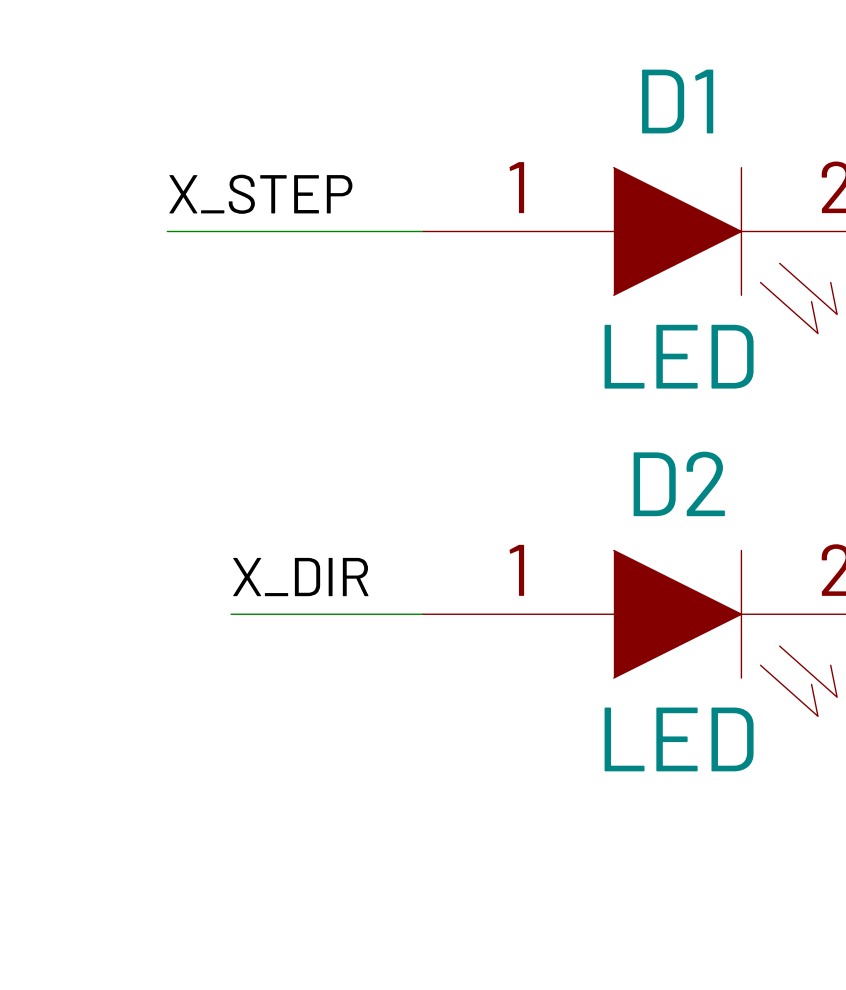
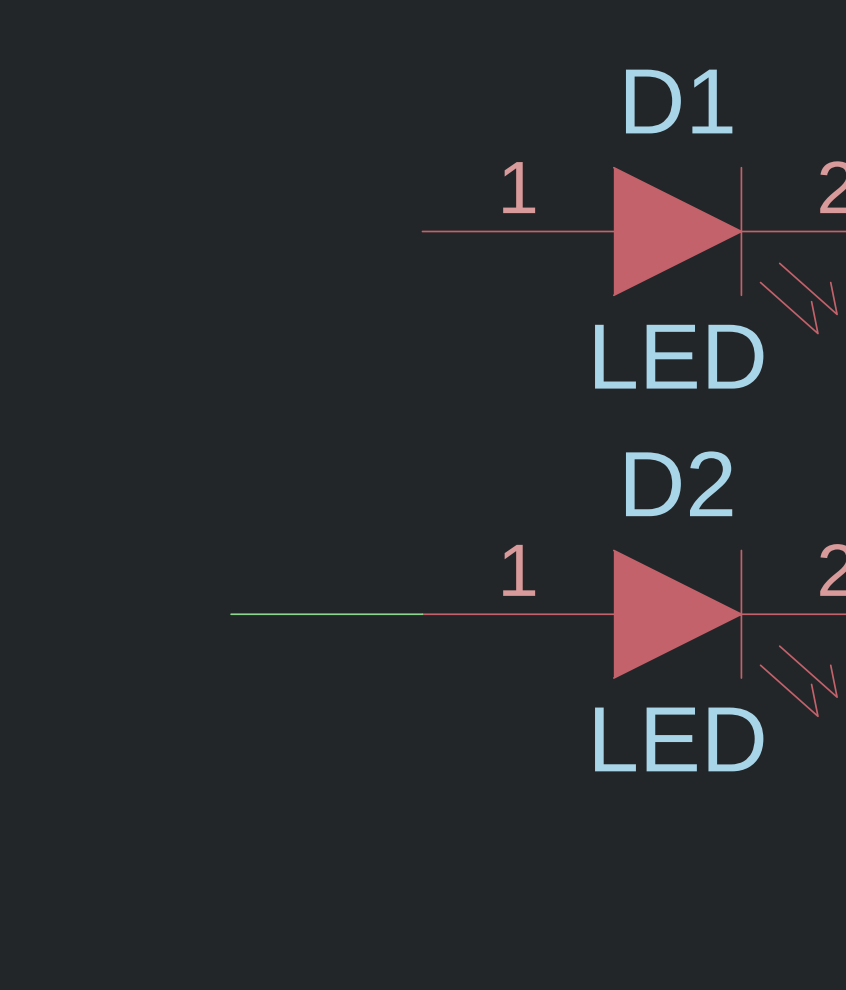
label: X_STEP (260, 194) -> none
wire: (167, 231) (422, 231) -> none
label: X_DIR (300, 577) -> none

